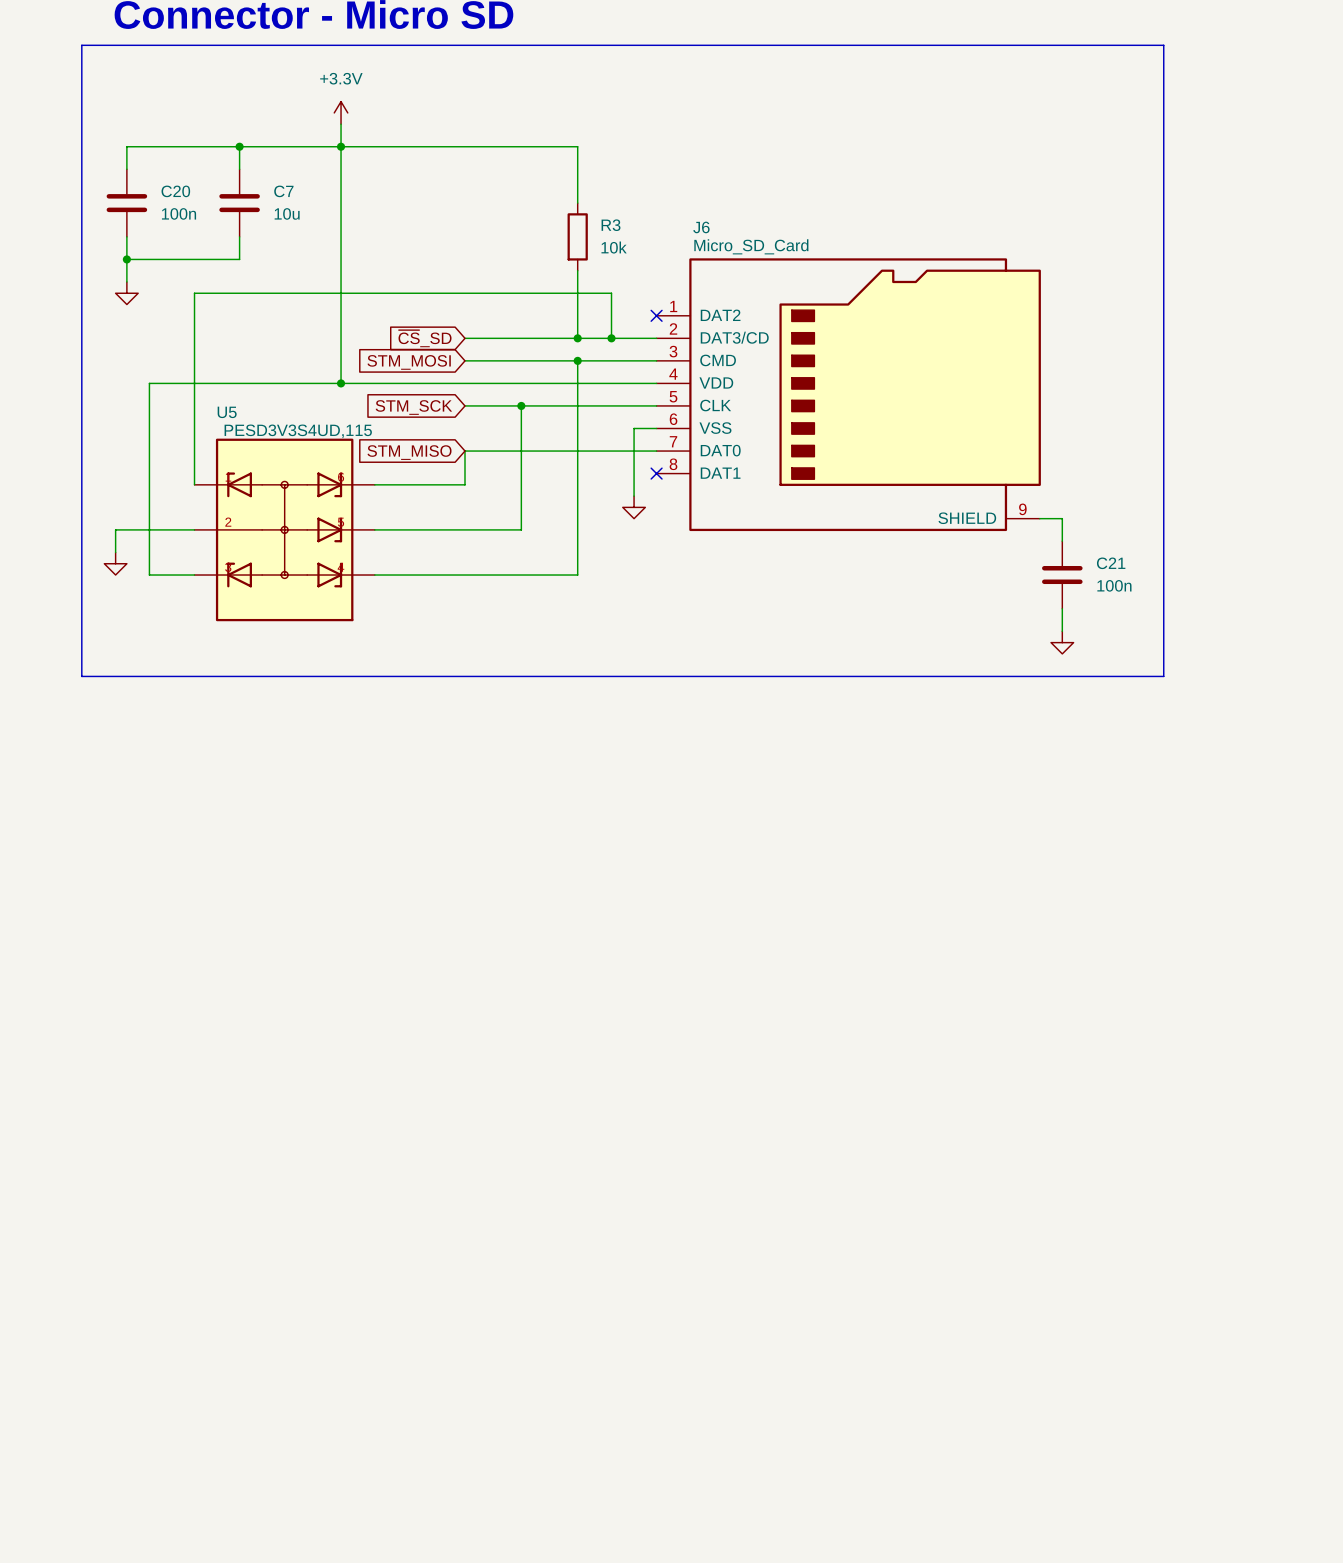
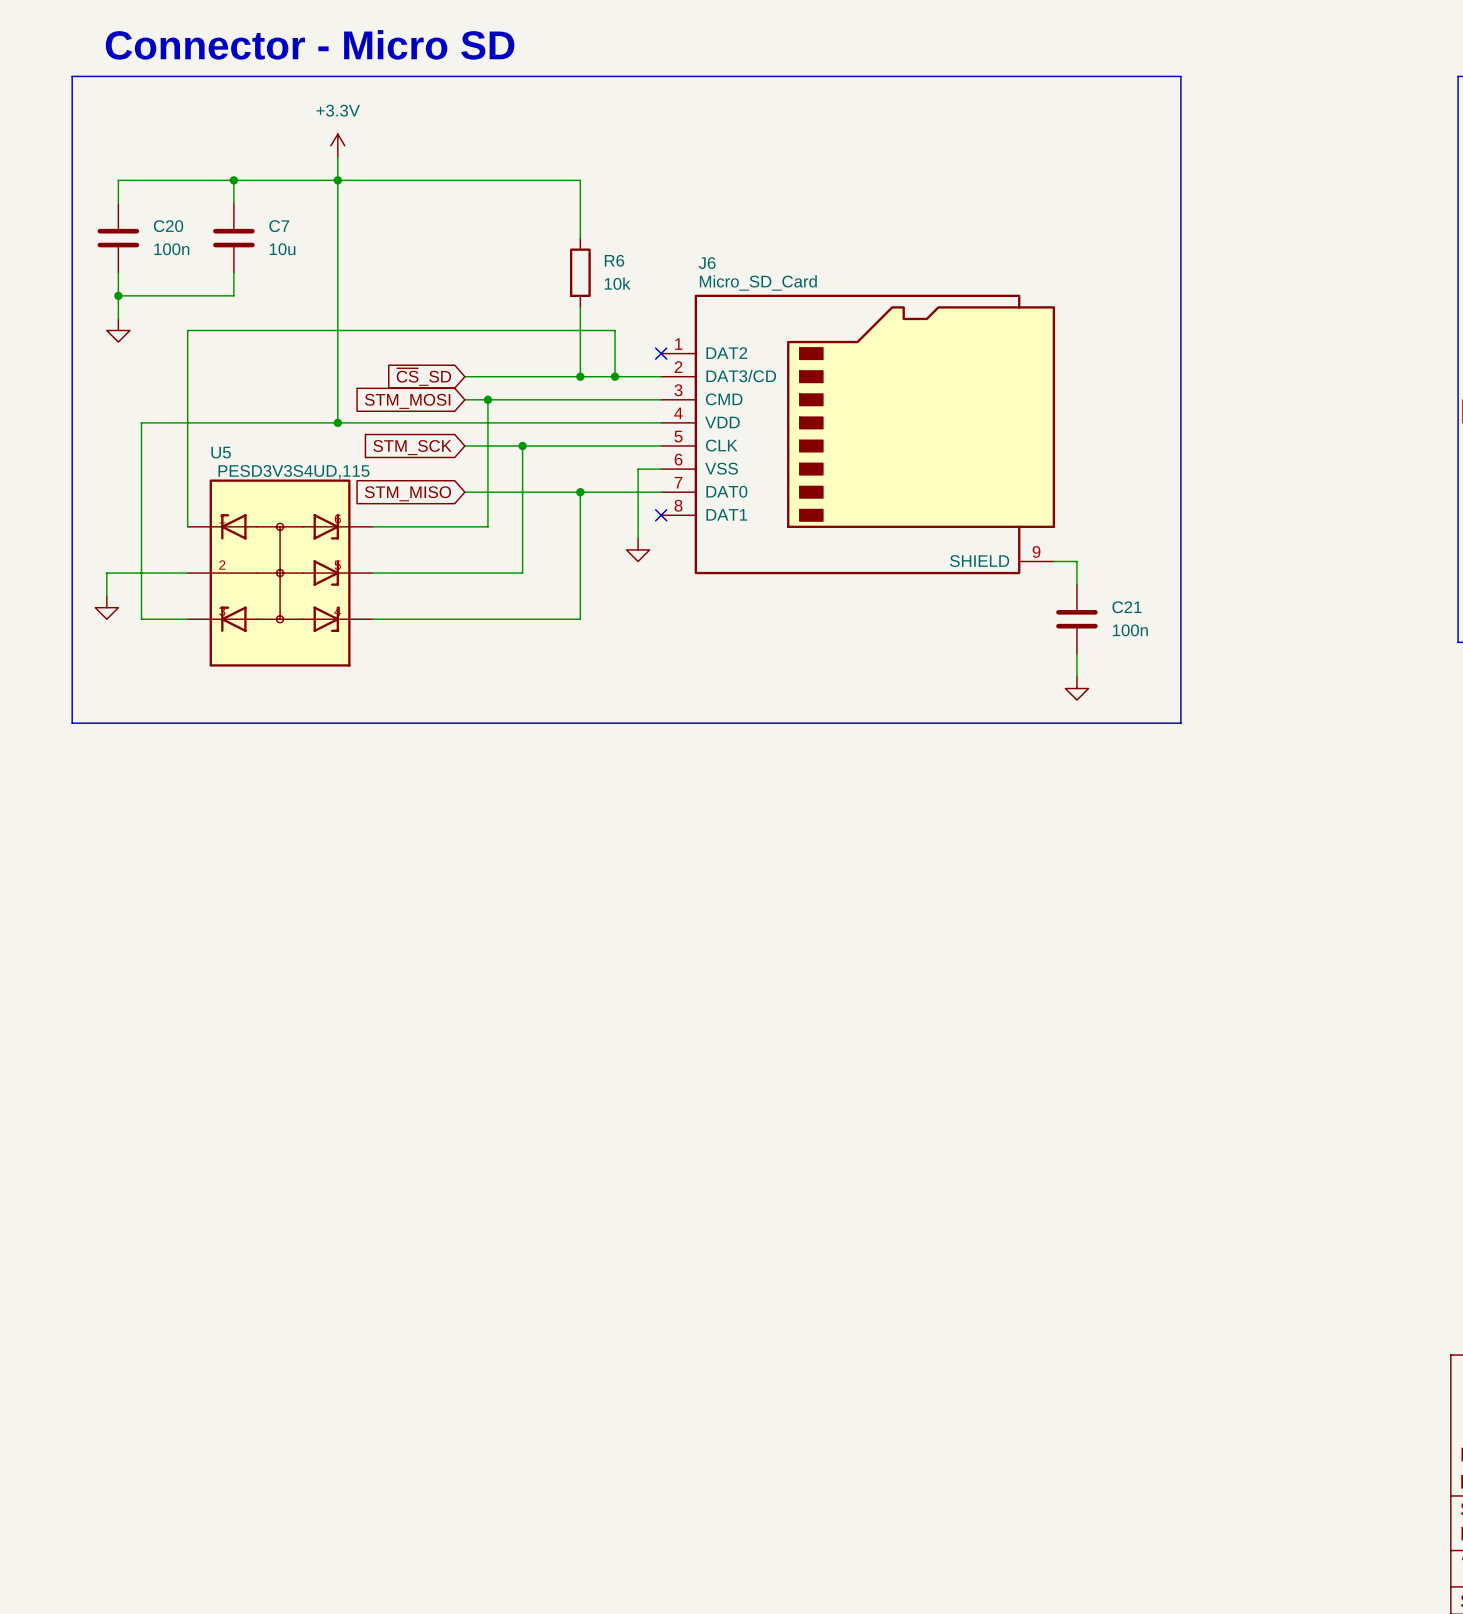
R3 name: R3 (611, 225) -> R6 (614, 260)
junction: none -> (487, 399)
wire: (577, 360) (577, 451) -> none
junction: (577, 360) -> none
wire: (464, 451) (464, 484) -> (487, 399) (487, 526) (464, 526)
junction: none -> (580, 492)

